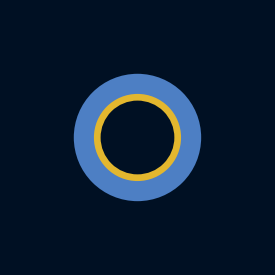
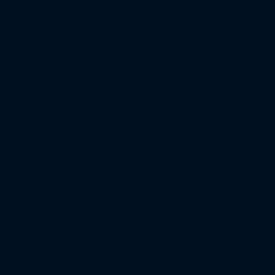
part: (137, 137) -> none

